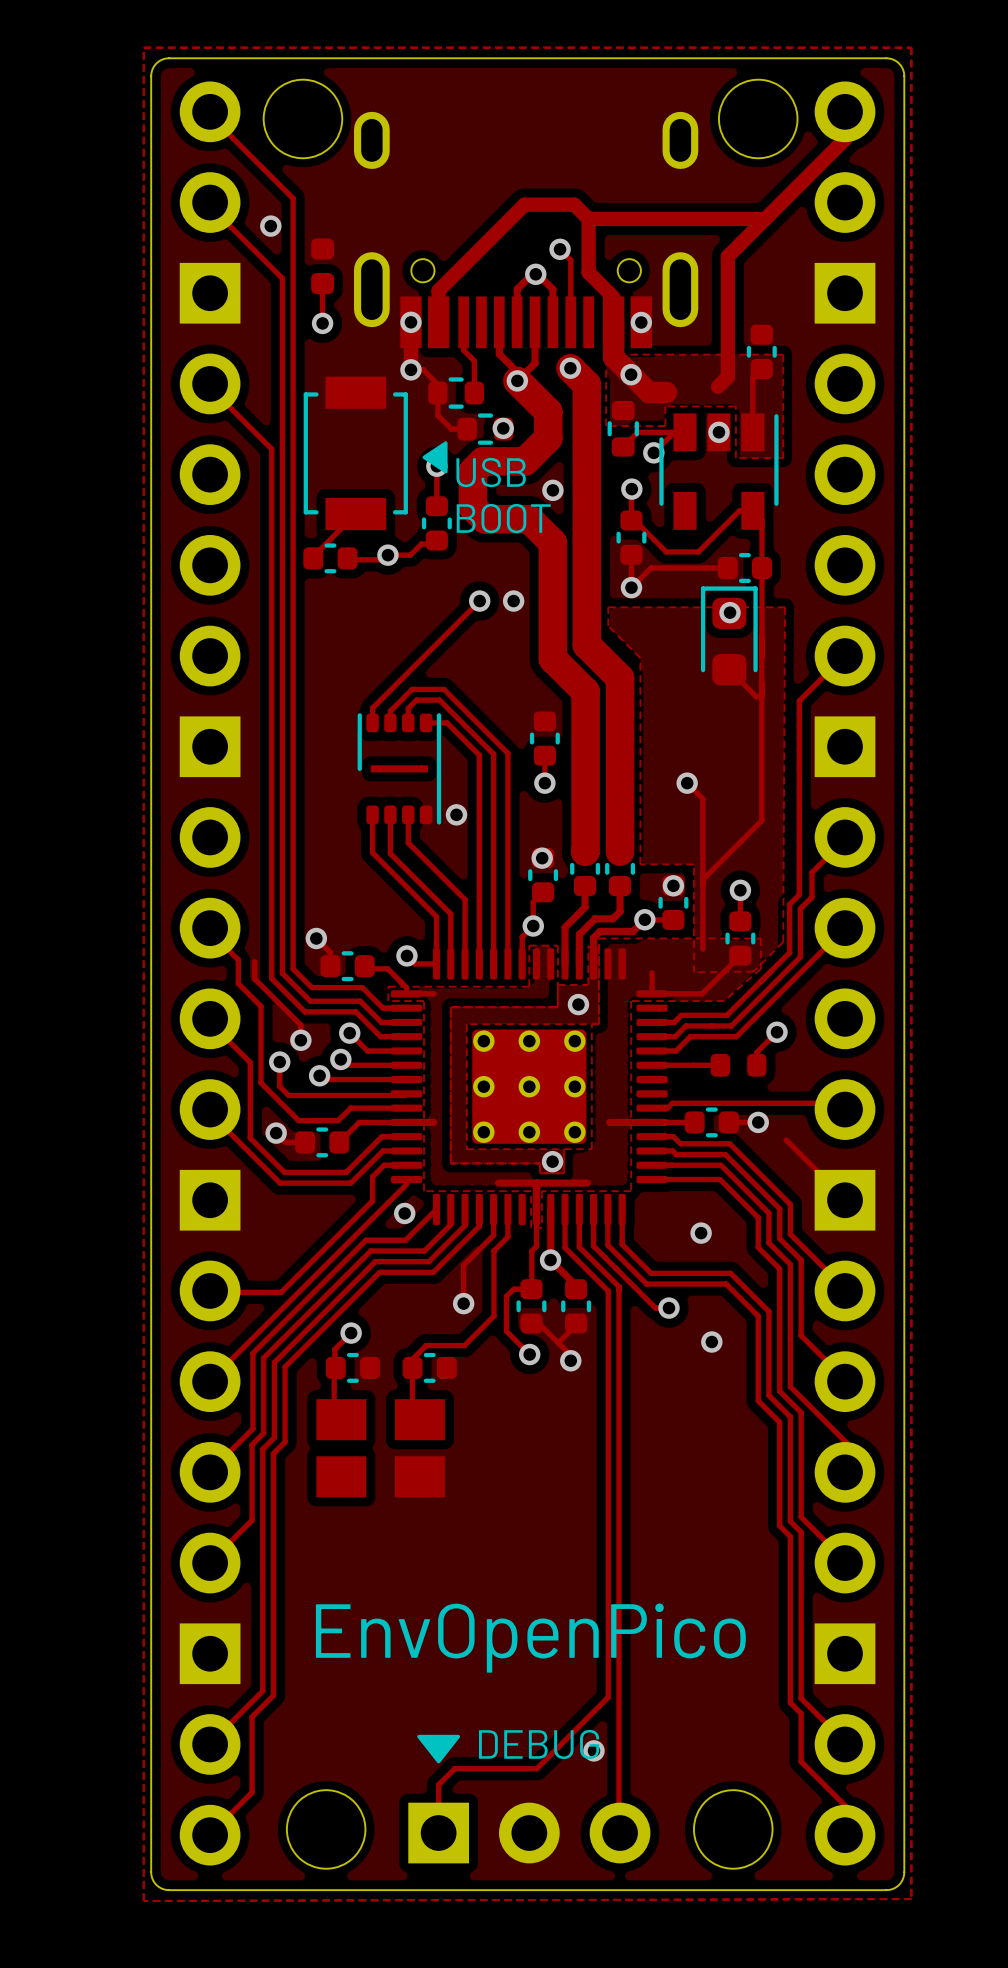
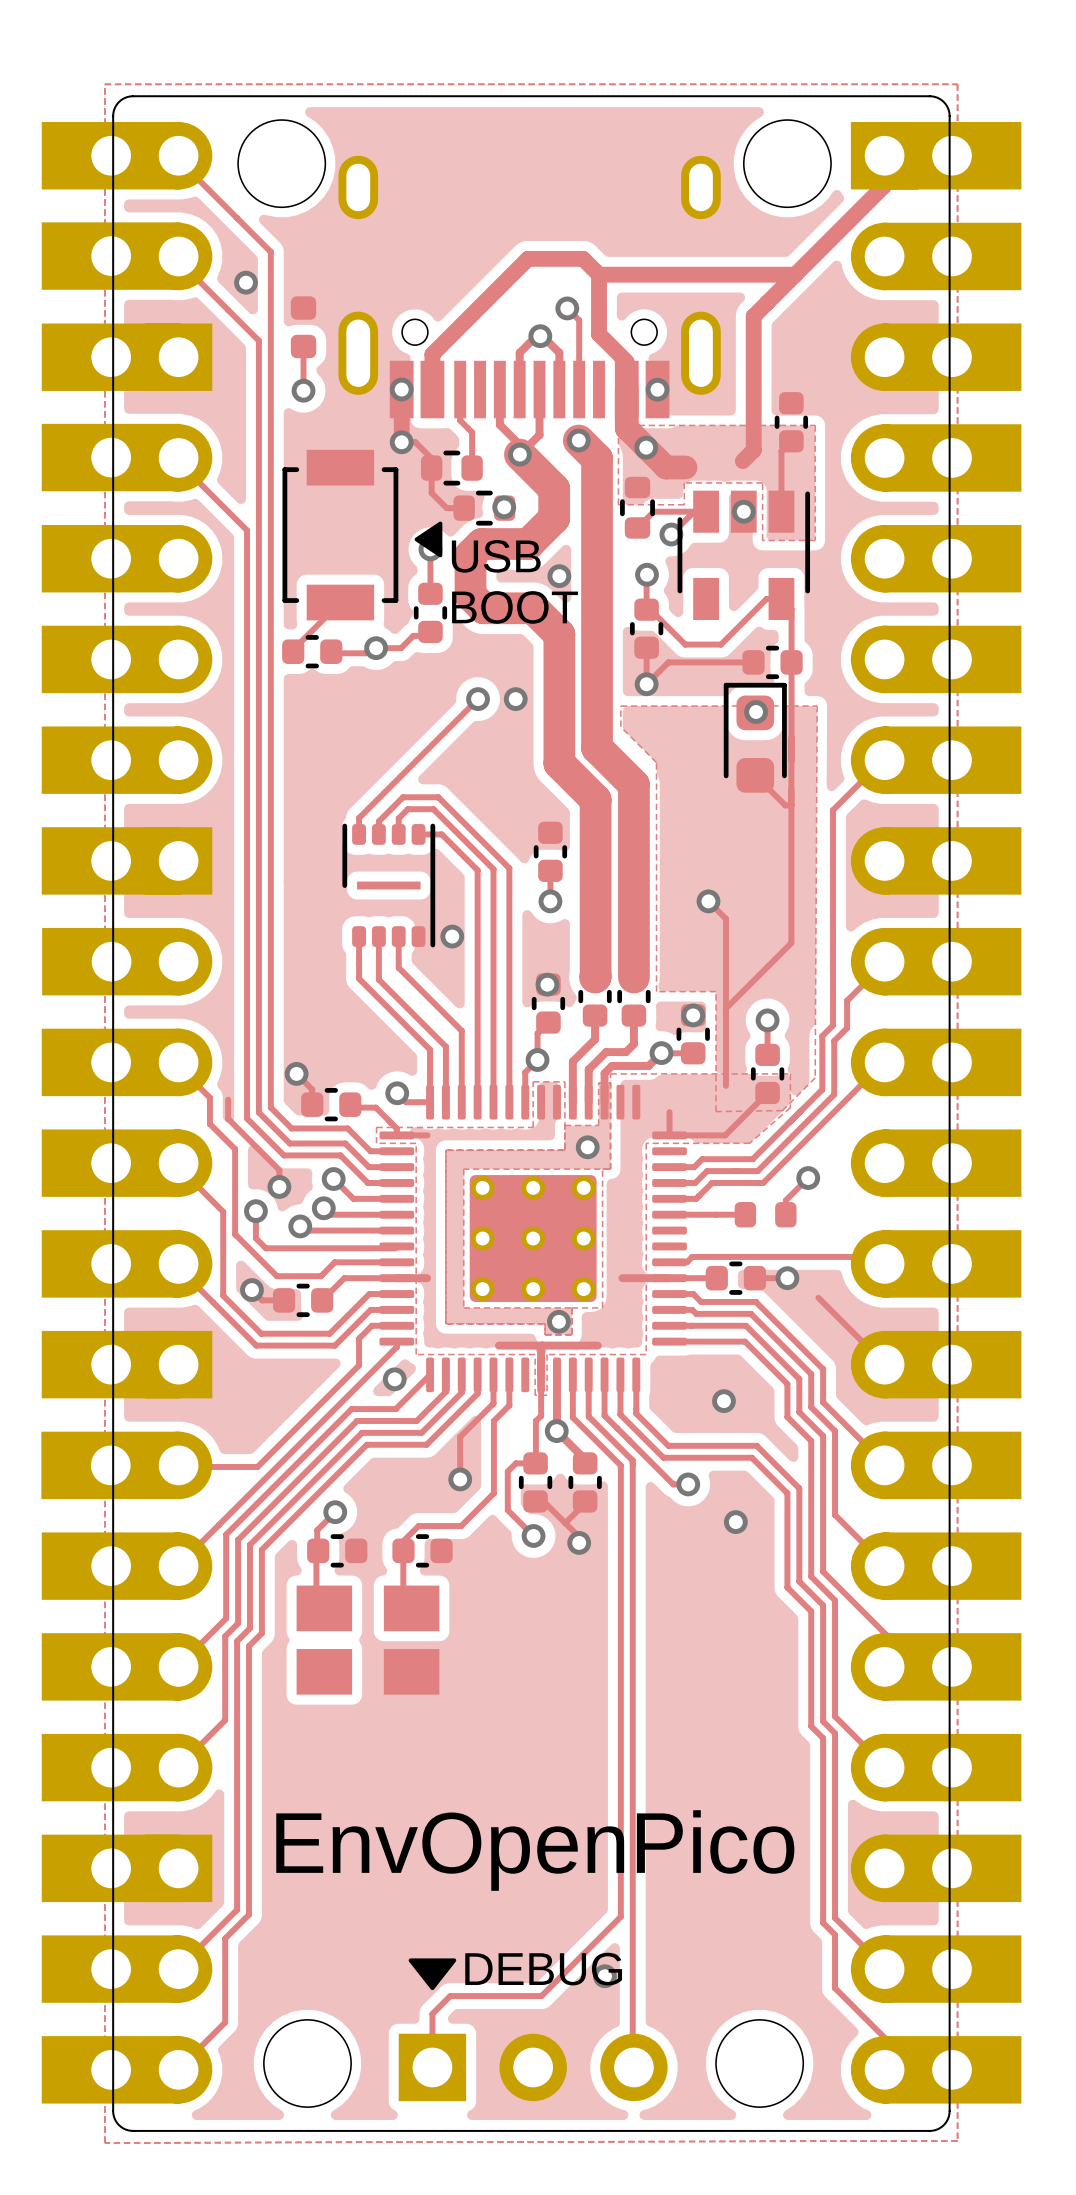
part: none -> (126, 1112)
part: (210, 973) -> none
part: (845, 973) -> none
part: none -> (936, 1112)

